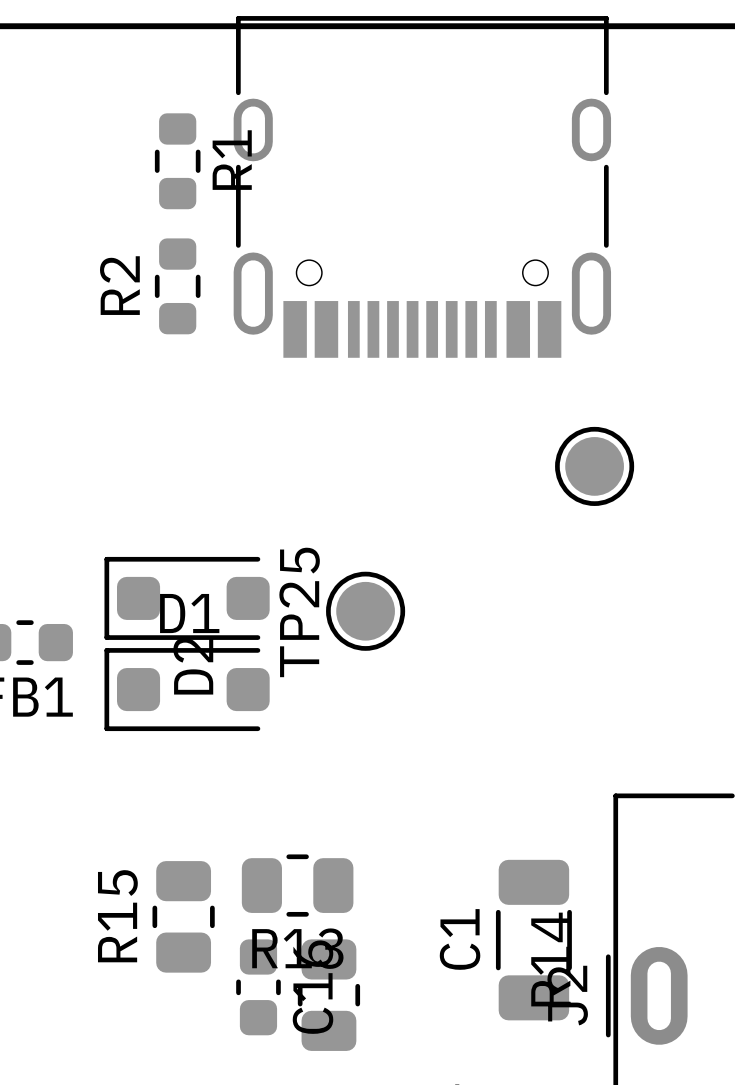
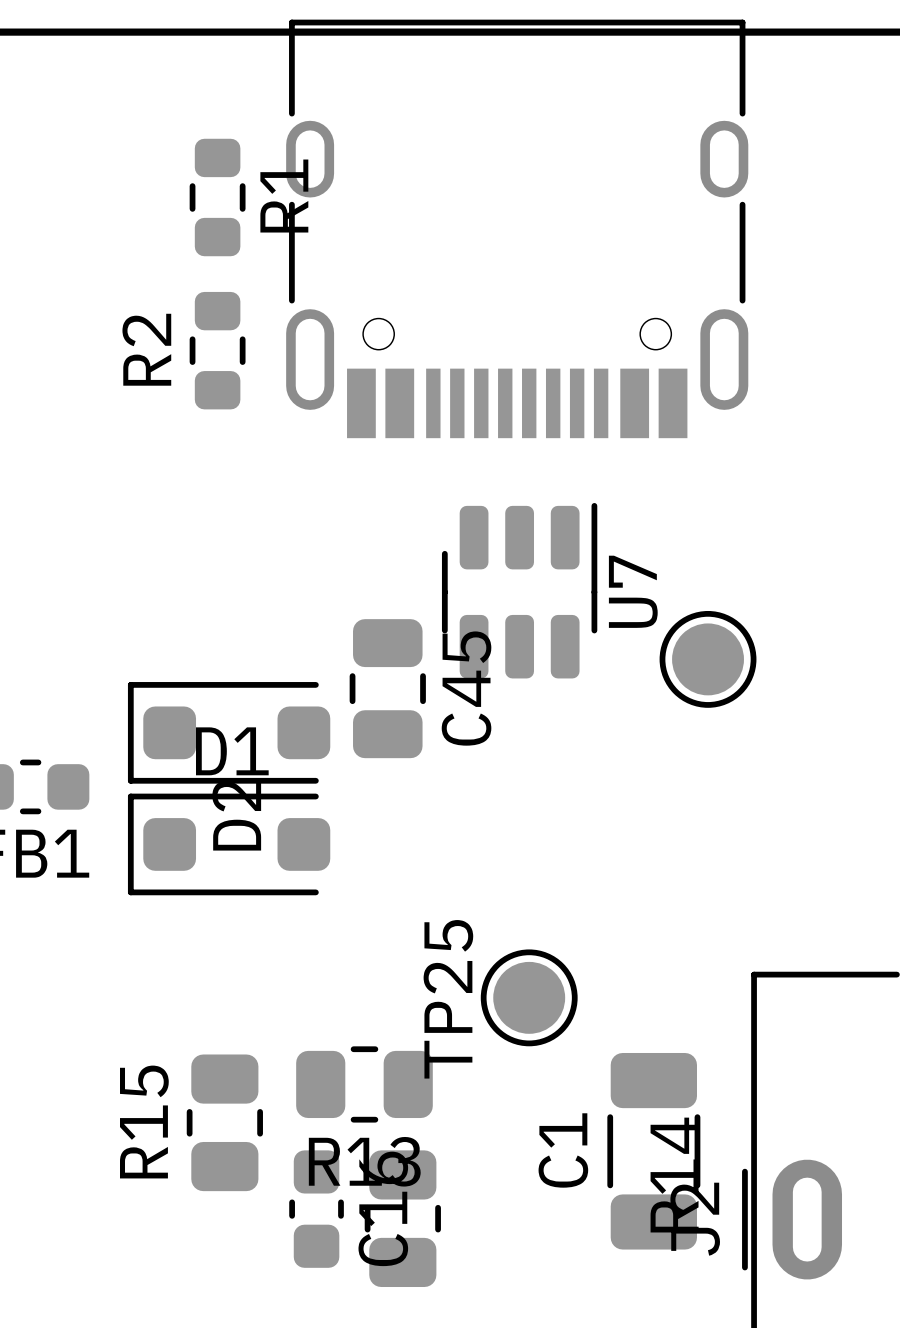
part position: (594, 466) -> (708, 659)
U7: none -> (519, 590)
C45: none -> (387, 688)
TP25 position: (365, 611) -> (529, 997)

